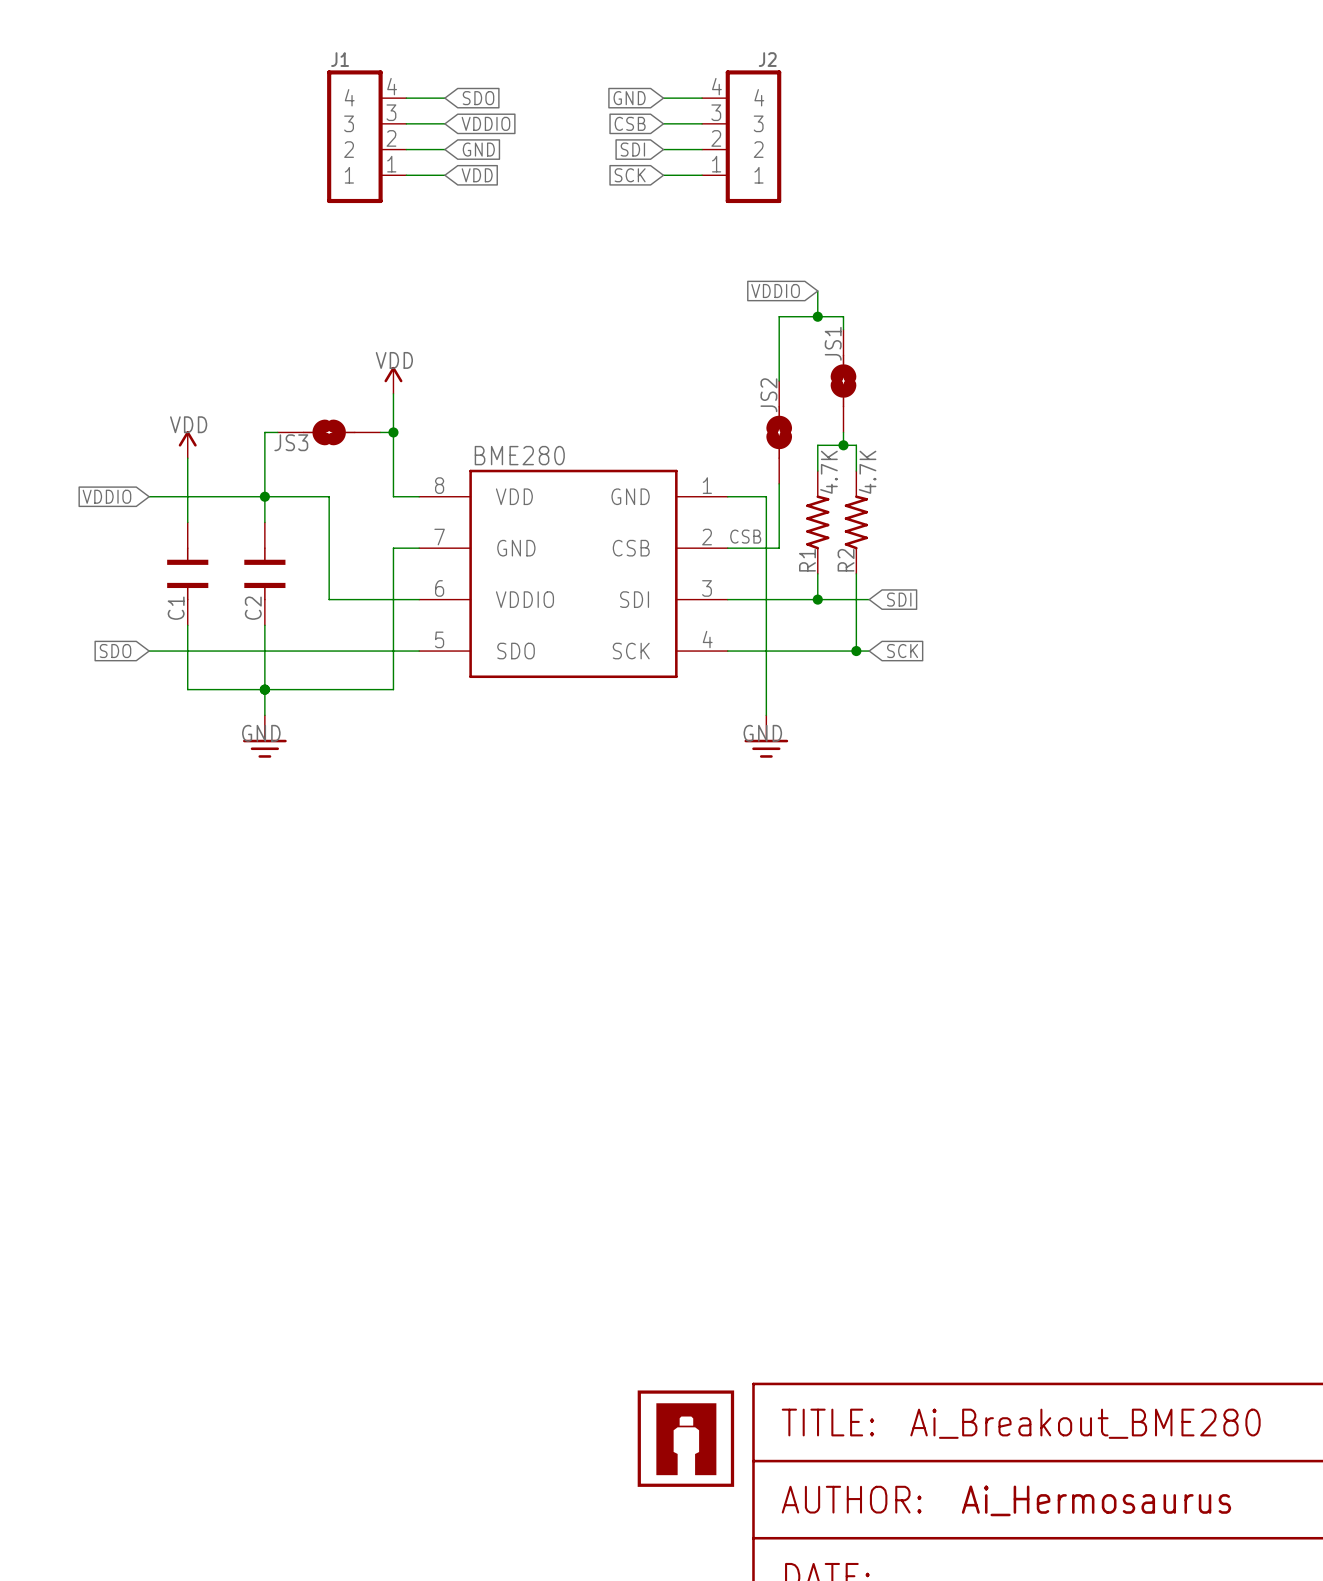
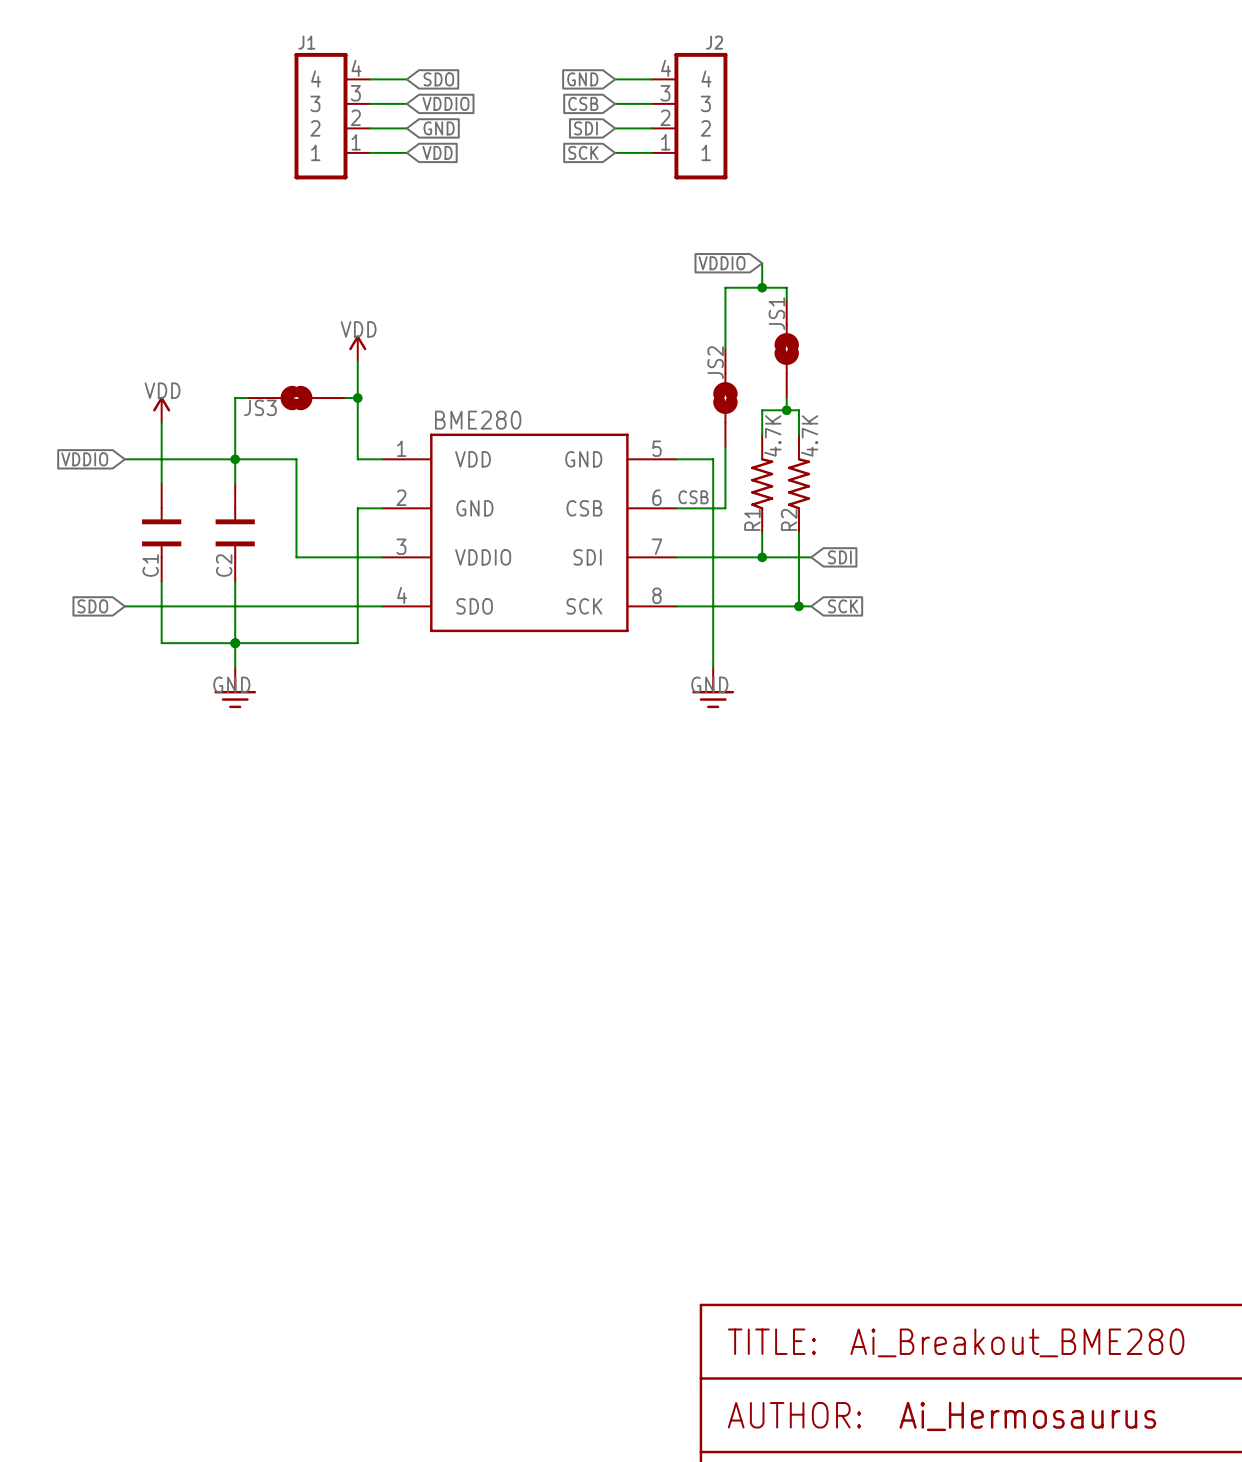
part pin number: 8 (439, 485) -> 1 (401, 448)
part pin number: 1 (707, 485) -> 5 (656, 448)
part pin number: 7 (439, 537) -> 2 (401, 497)
part pin number: 2 (707, 537) -> 6 (656, 497)
part pin number: 6 (439, 588) -> 3 (401, 546)
part pin number: 3 (707, 588) -> 7 (656, 546)
part pin number: 5 (439, 639) -> 4 (402, 595)
part pin number: 4 (707, 639) -> 8 (656, 595)
part: (685, 1438) -> none

